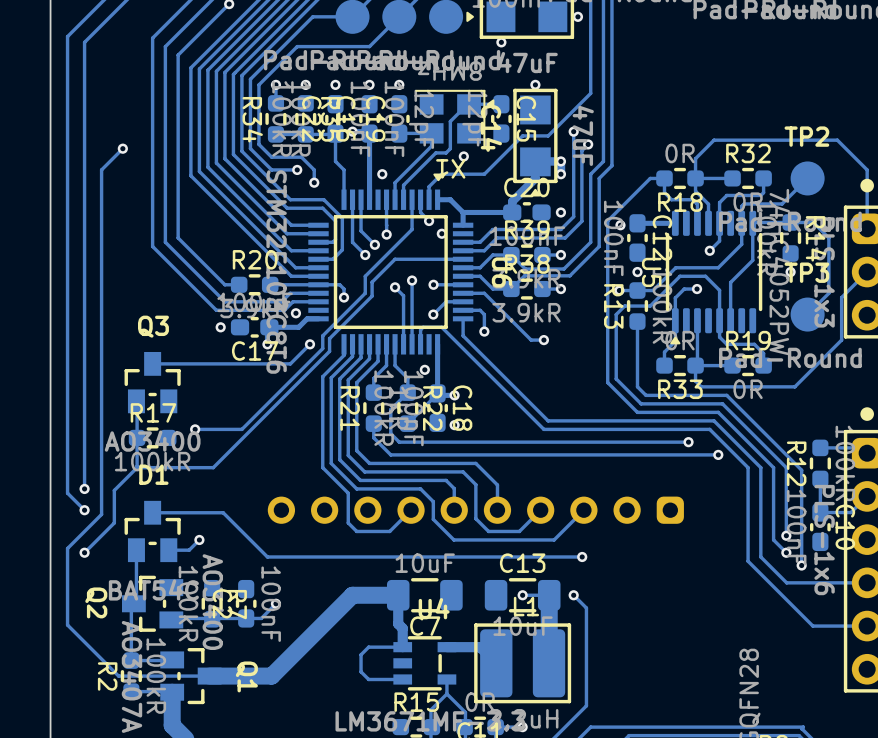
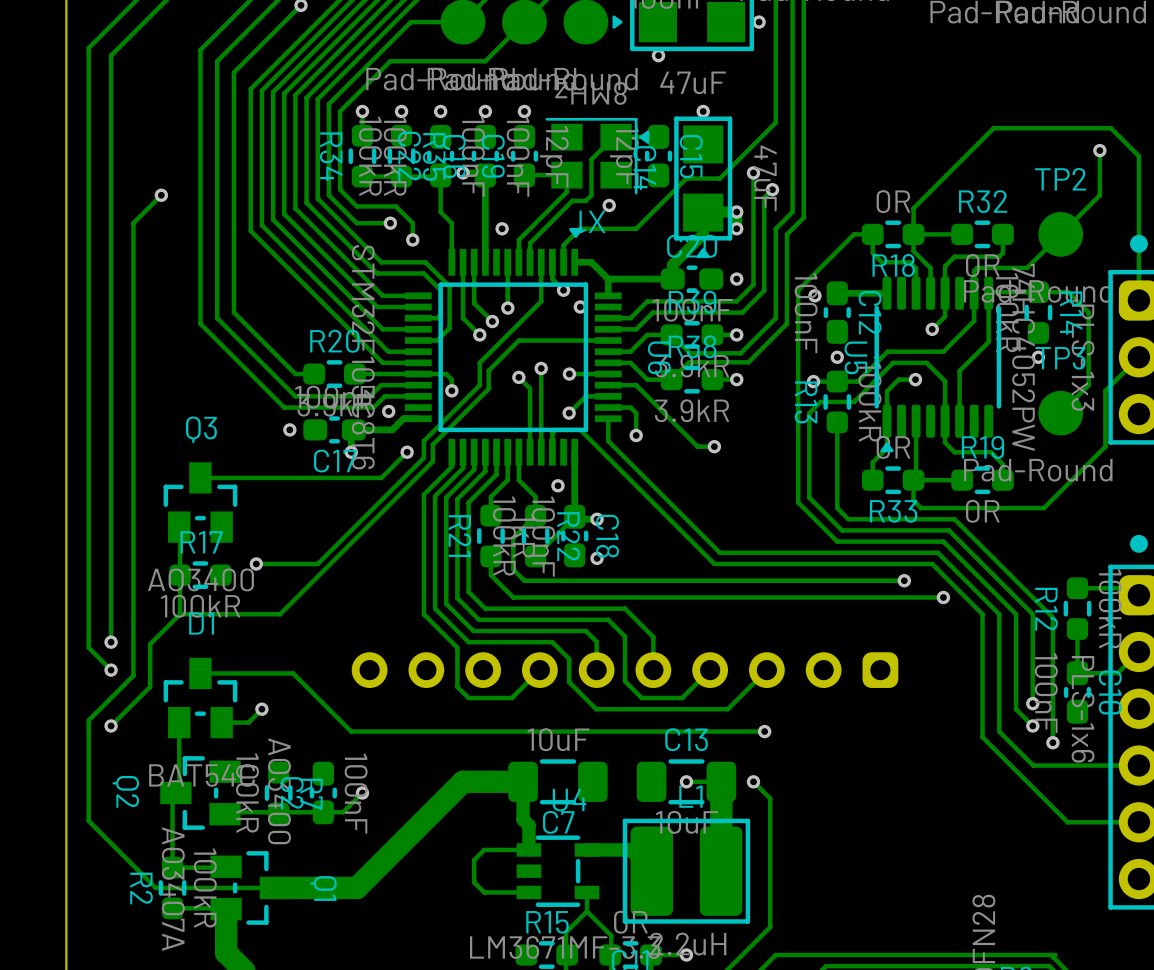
track: none -> (1099, 150) (1099, 195) (1060, 234)
via: none -> (1099, 150)
track: (714, 140) (837, 140) (867, 169) -> (937, 184) (993, 128) (1111, 128) (1138, 156) (1138, 223)

